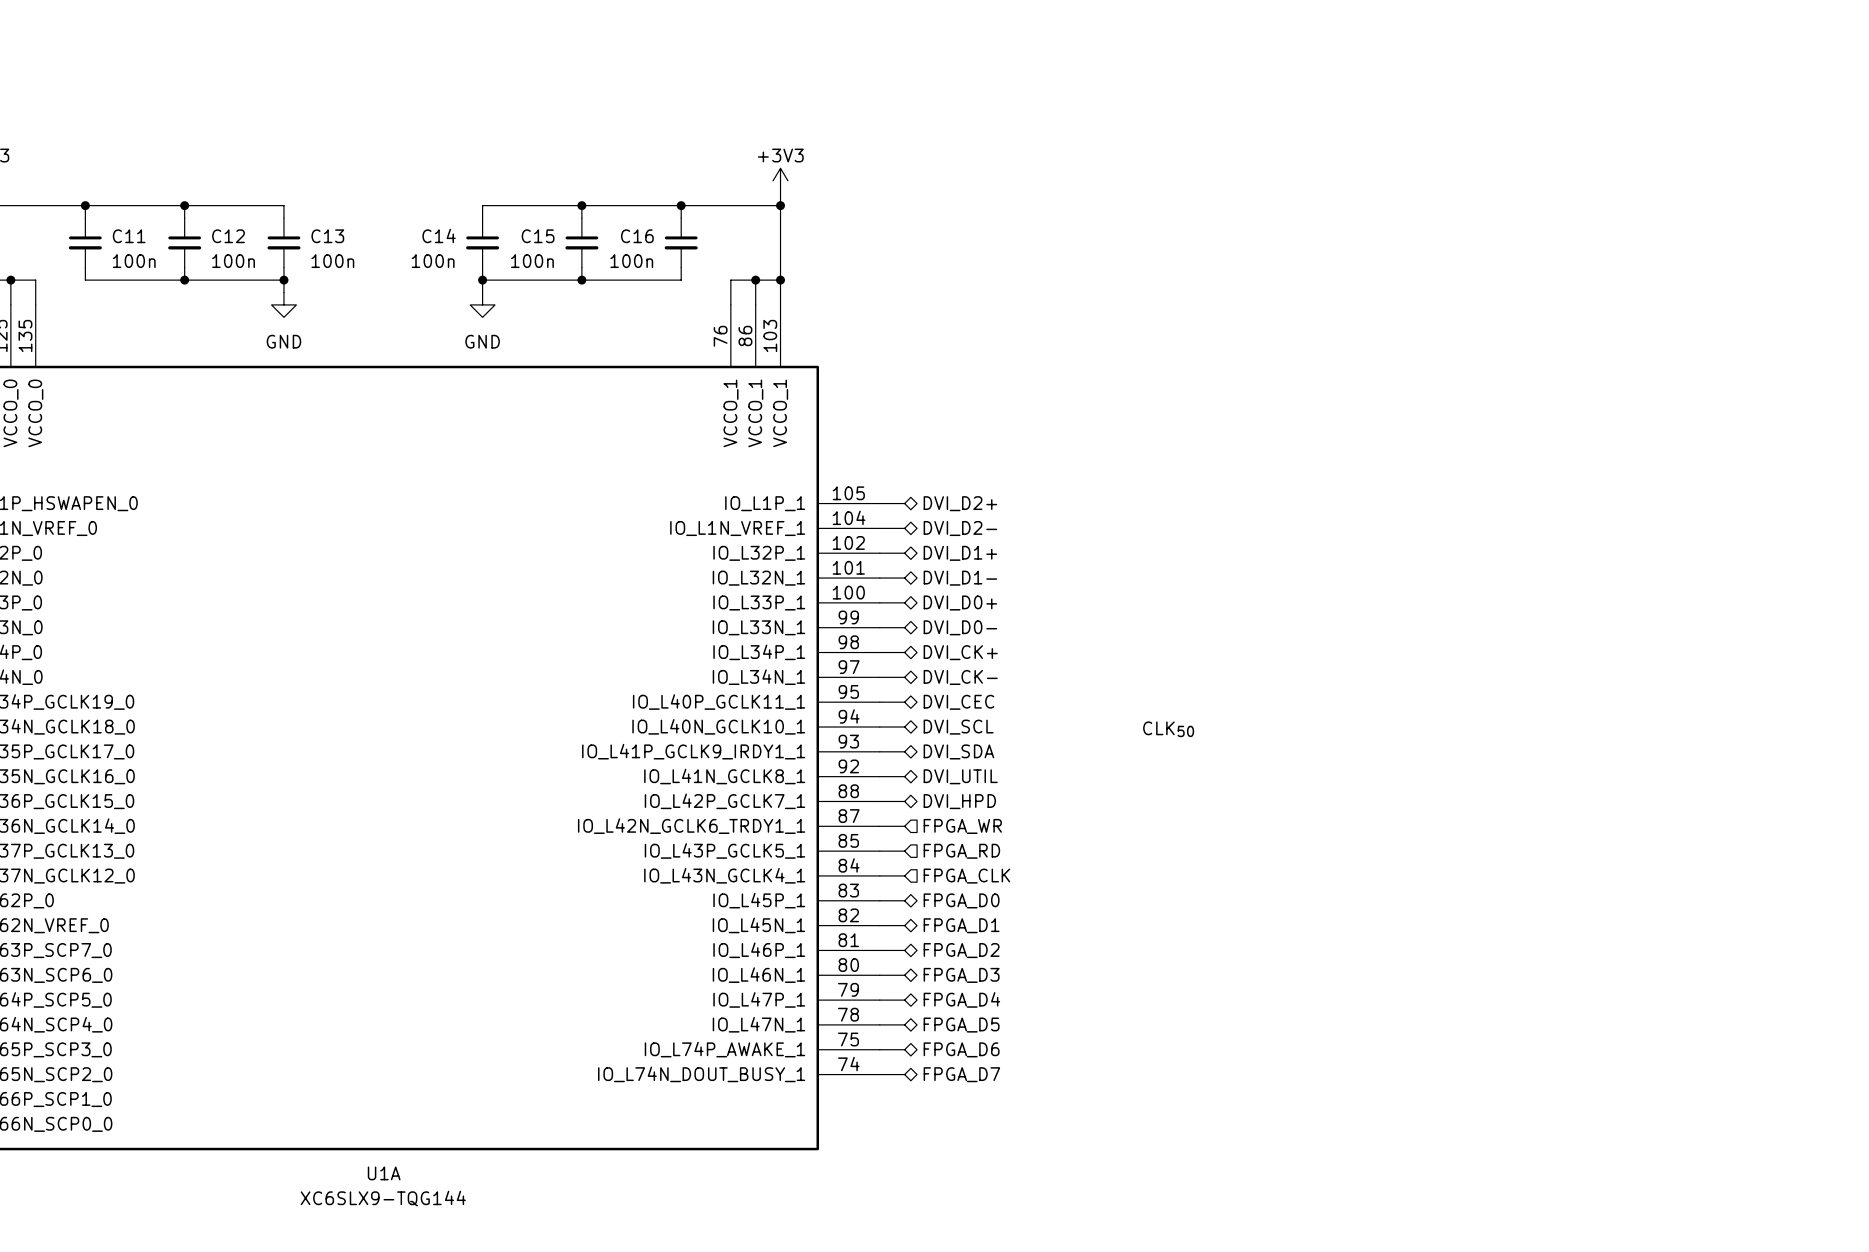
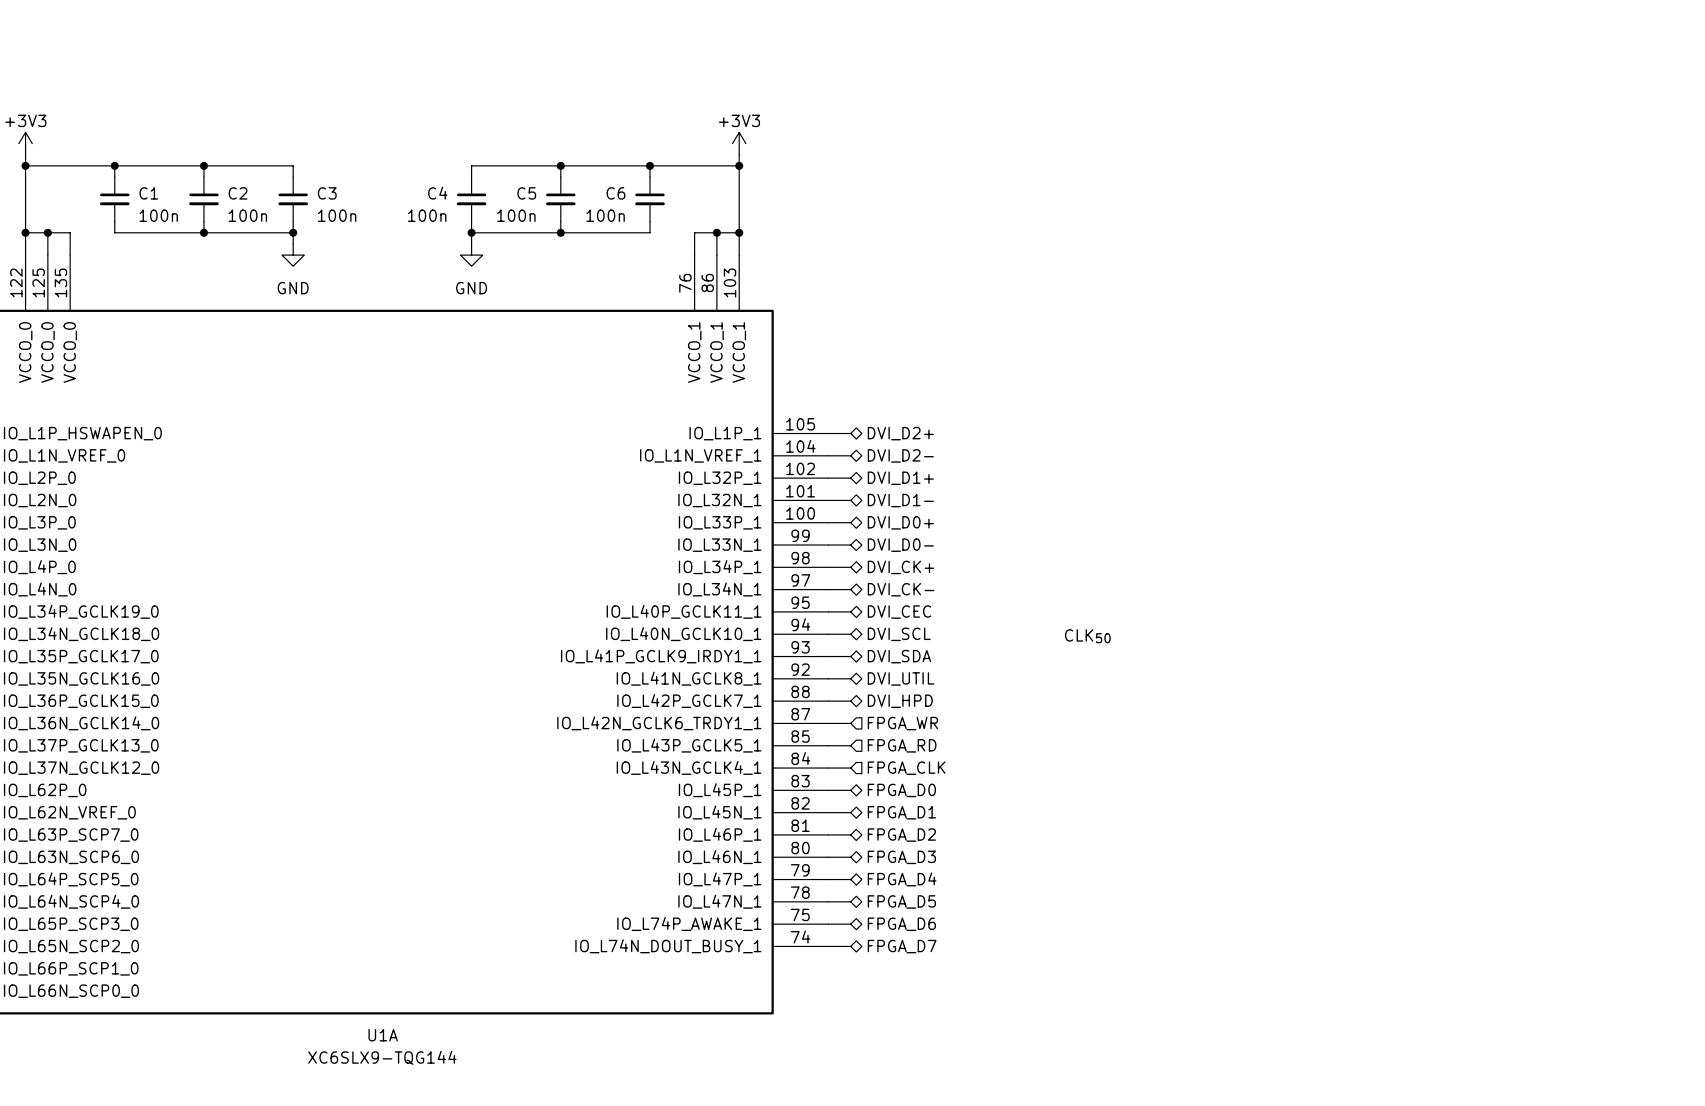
C14 name: C14 (439, 235) -> C4 (437, 193)
C11 name: C11 (129, 236) -> C1 (148, 193)
C12 name: C12 (228, 236) -> C2 (238, 193)
C13 name: C13 (327, 236) -> C3 (327, 193)
C15 name: C15 (538, 236) -> C5 (526, 193)
C16 name: C16 (637, 236) -> C6 (615, 193)

